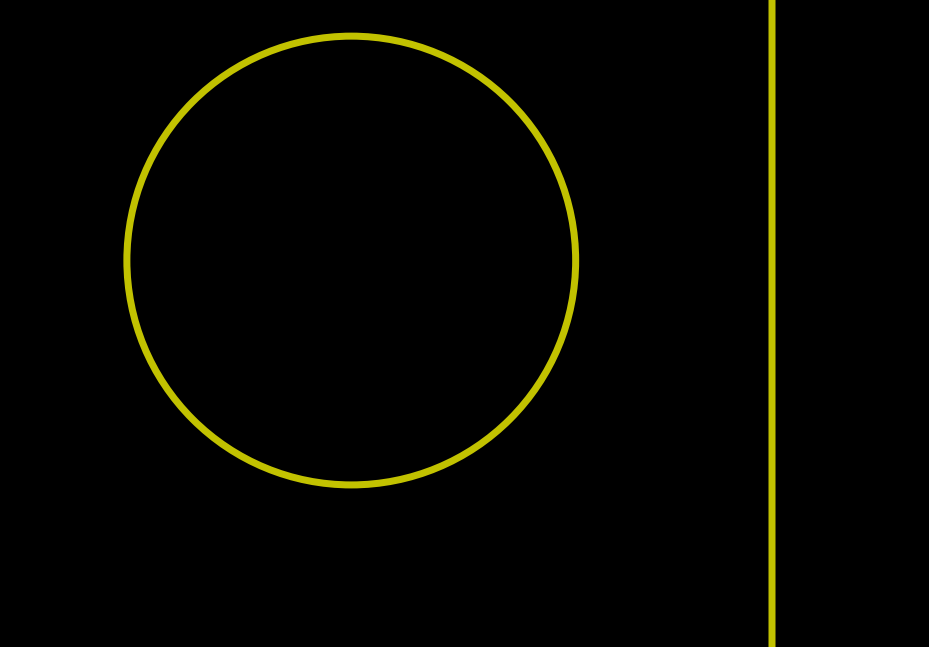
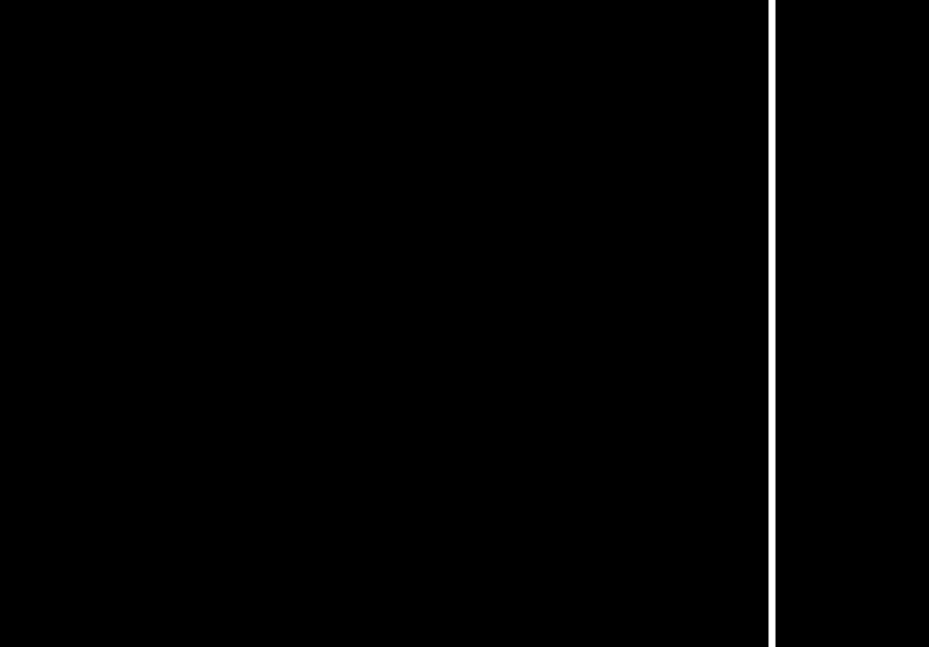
round board edge: [123, 32, 580, 489] -> none

